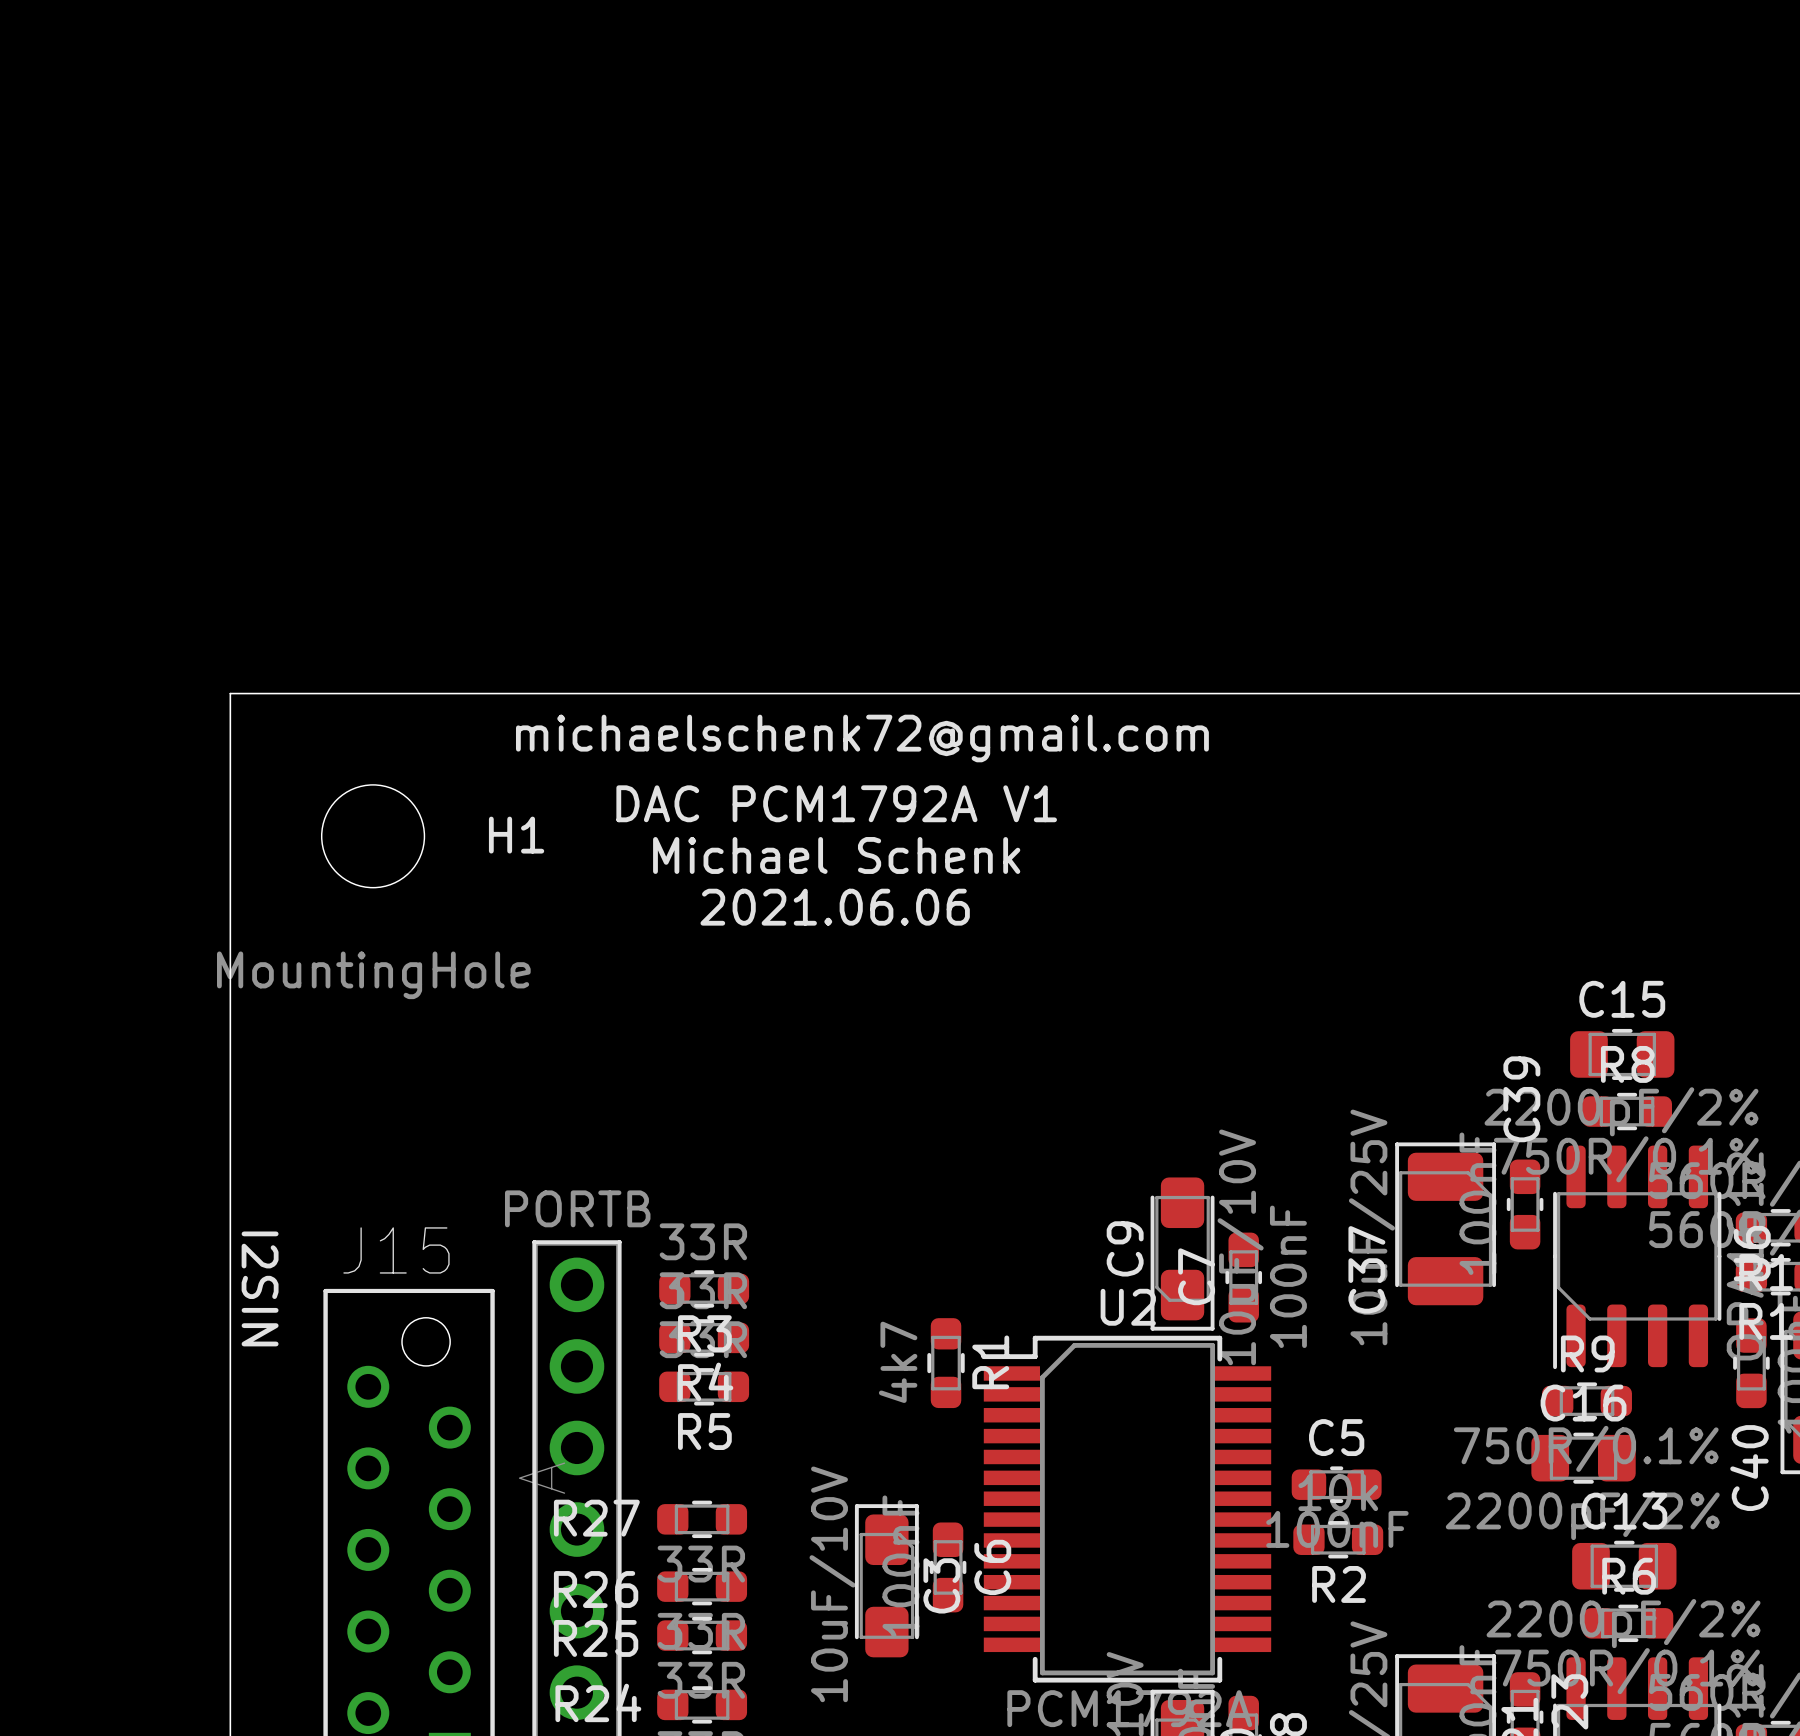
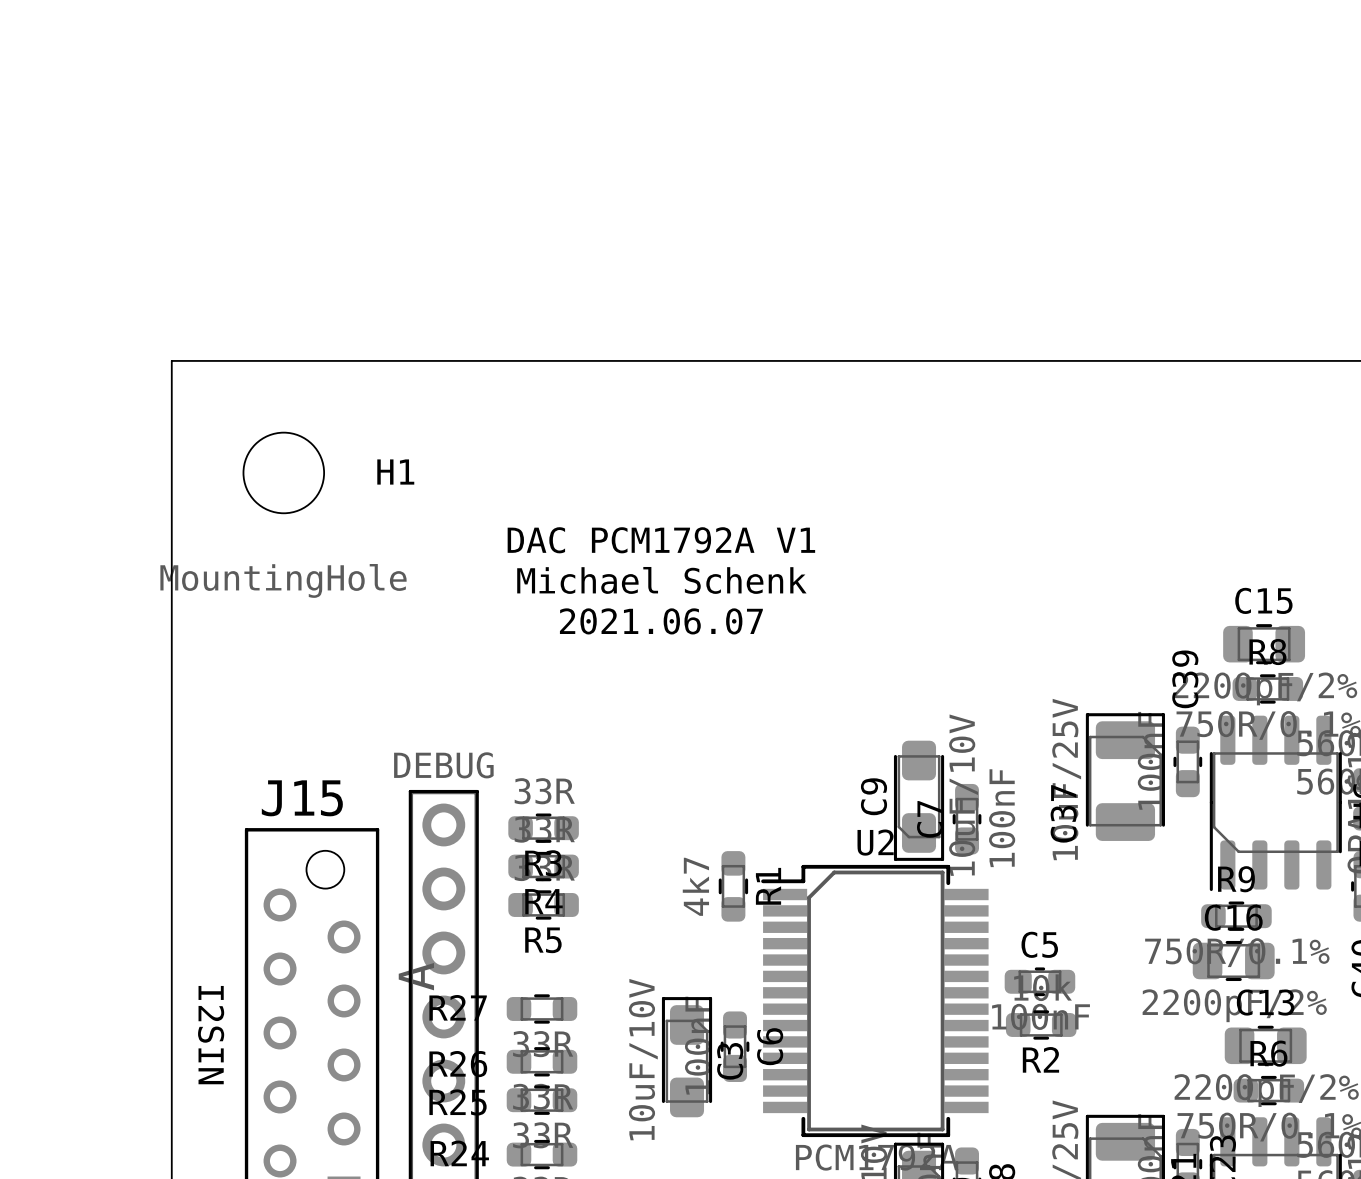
text: michaelschenk72@gmail.com (862, 738) -> none
text: DAC PCM1792A V1 (836, 803) -> none
text position: Michael Schenk (836, 855) -> Michael Schenk (661, 580)
text: 2021.06.06 (835, 907) -> DAC PCM1792A V1 (661, 540)
text: none -> 2021.06.07 (661, 621)
part value: PORTB (577, 1208) -> DEBUG (443, 765)
text position: I2SIN (260, 1288) -> I2SIN (211, 1035)

